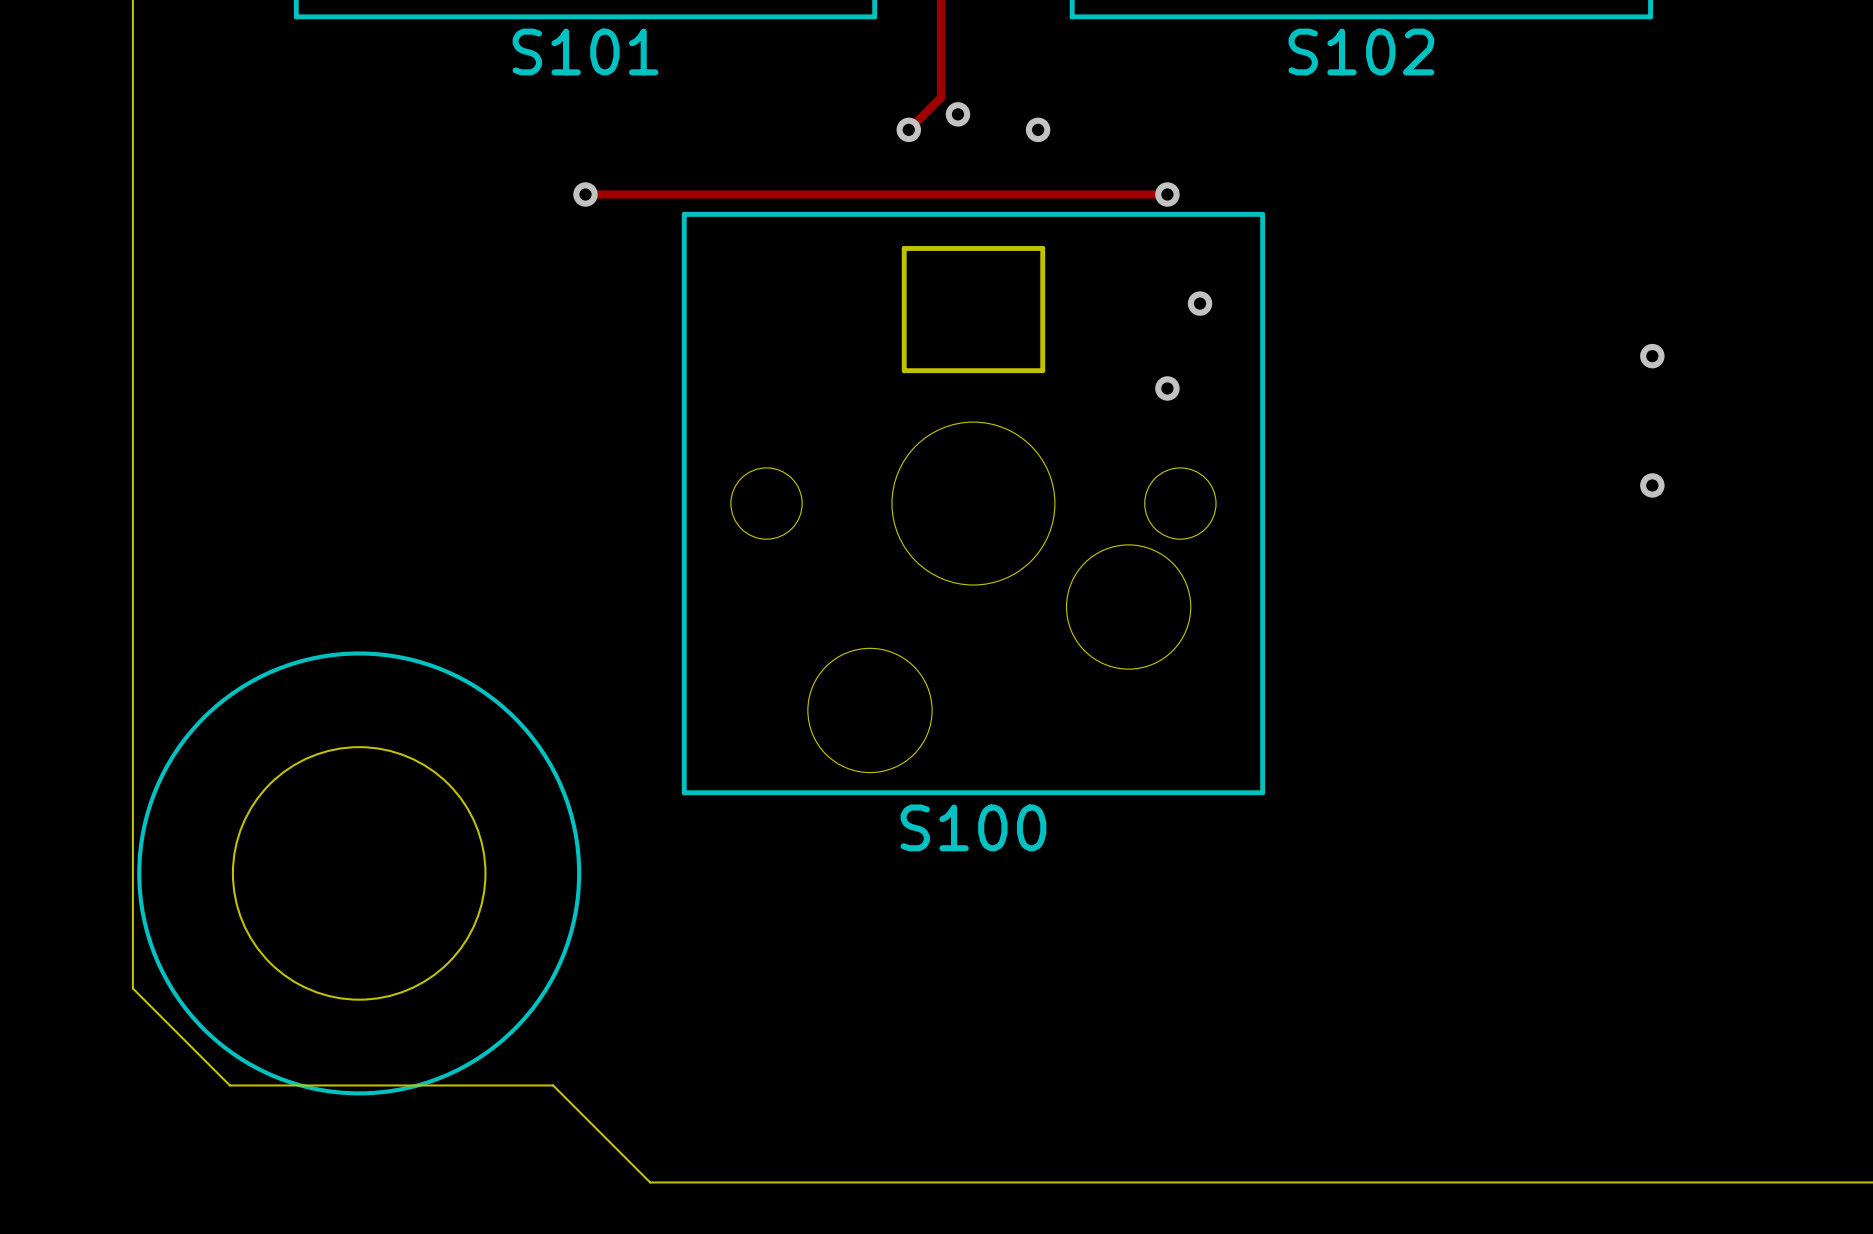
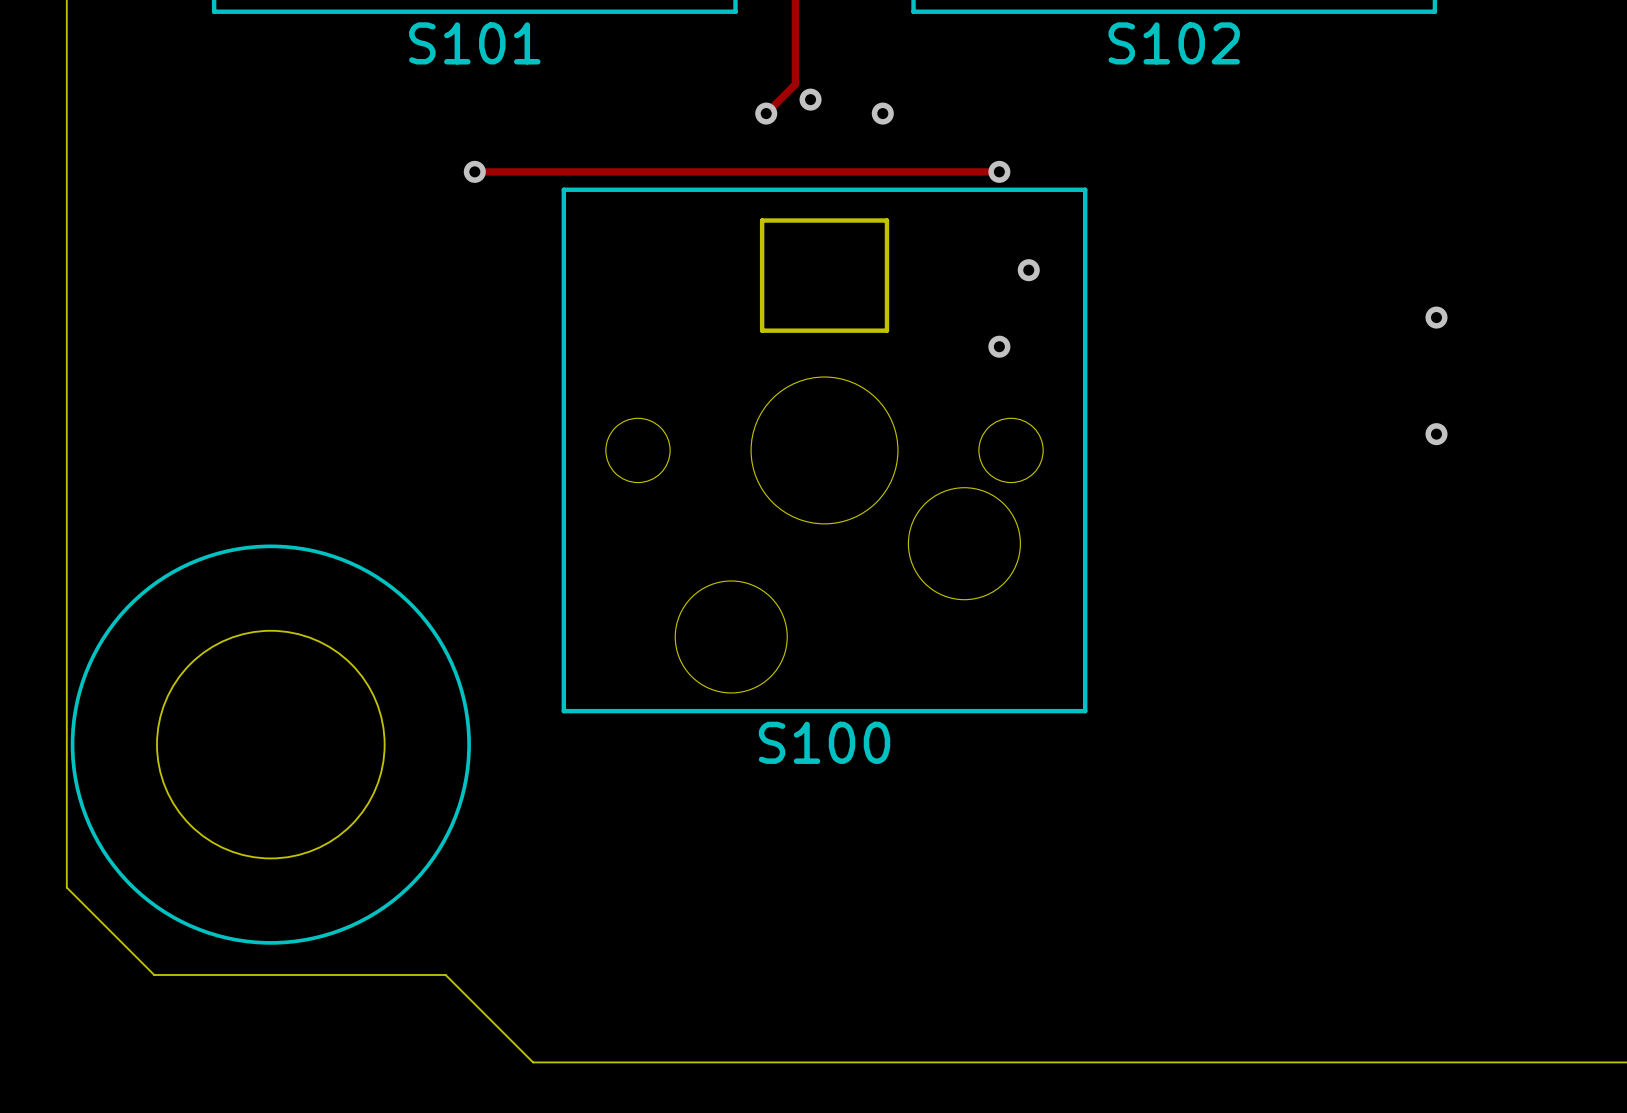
drawing position: (359, 873) -> (270, 744)
round board edge position: (359, 873) -> (270, 744)

